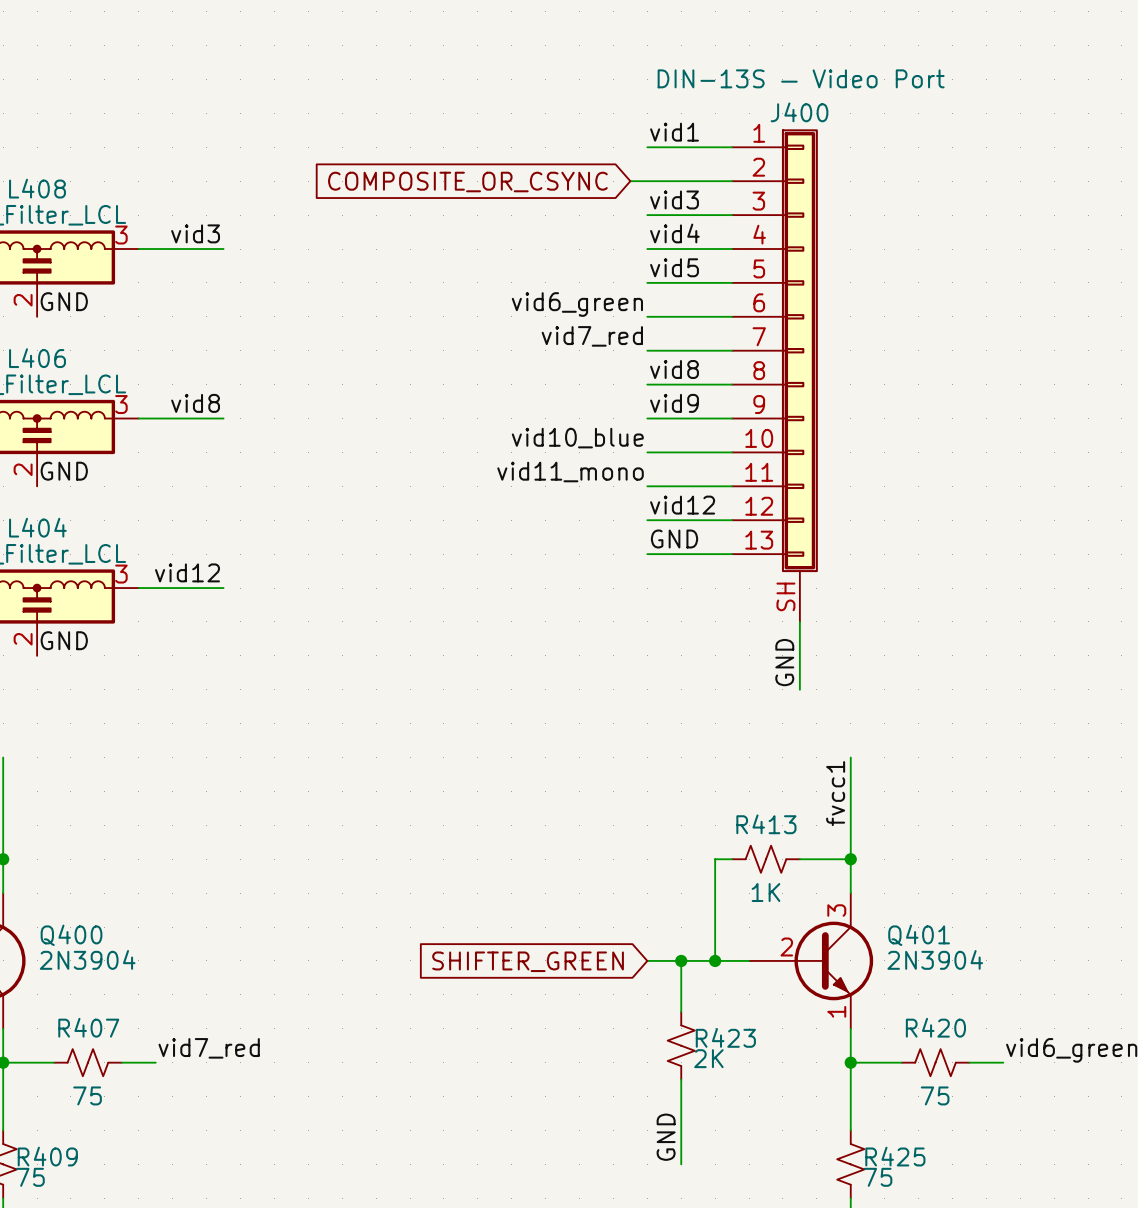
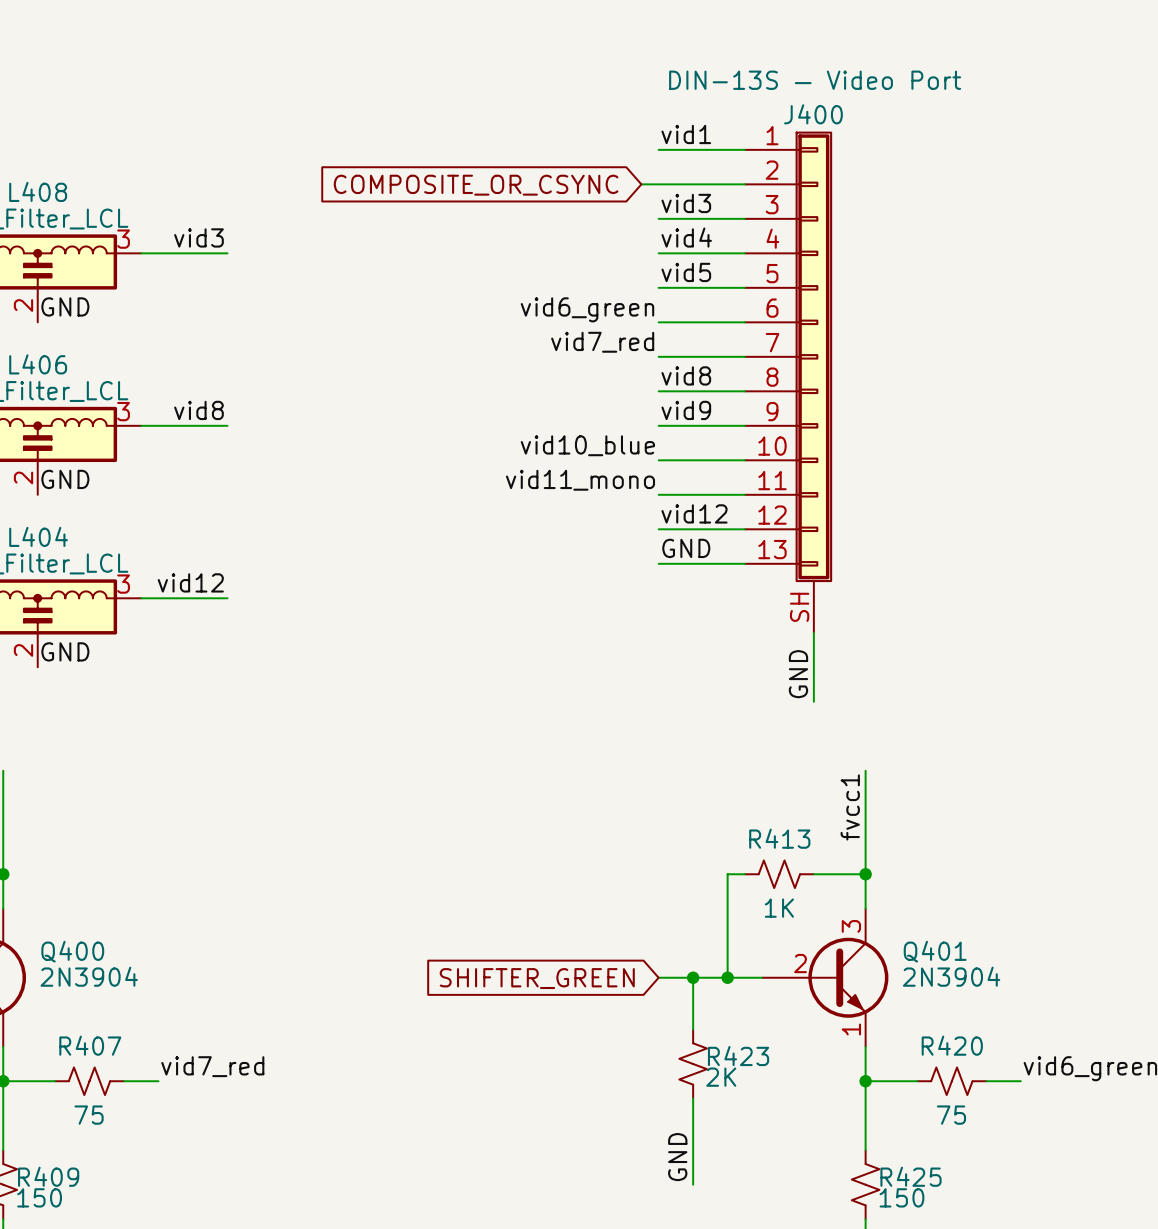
R409 value: 75 (30, 1177) -> 150 (39, 1197)
R425 value: 75 (878, 1177) -> 150 (901, 1197)

